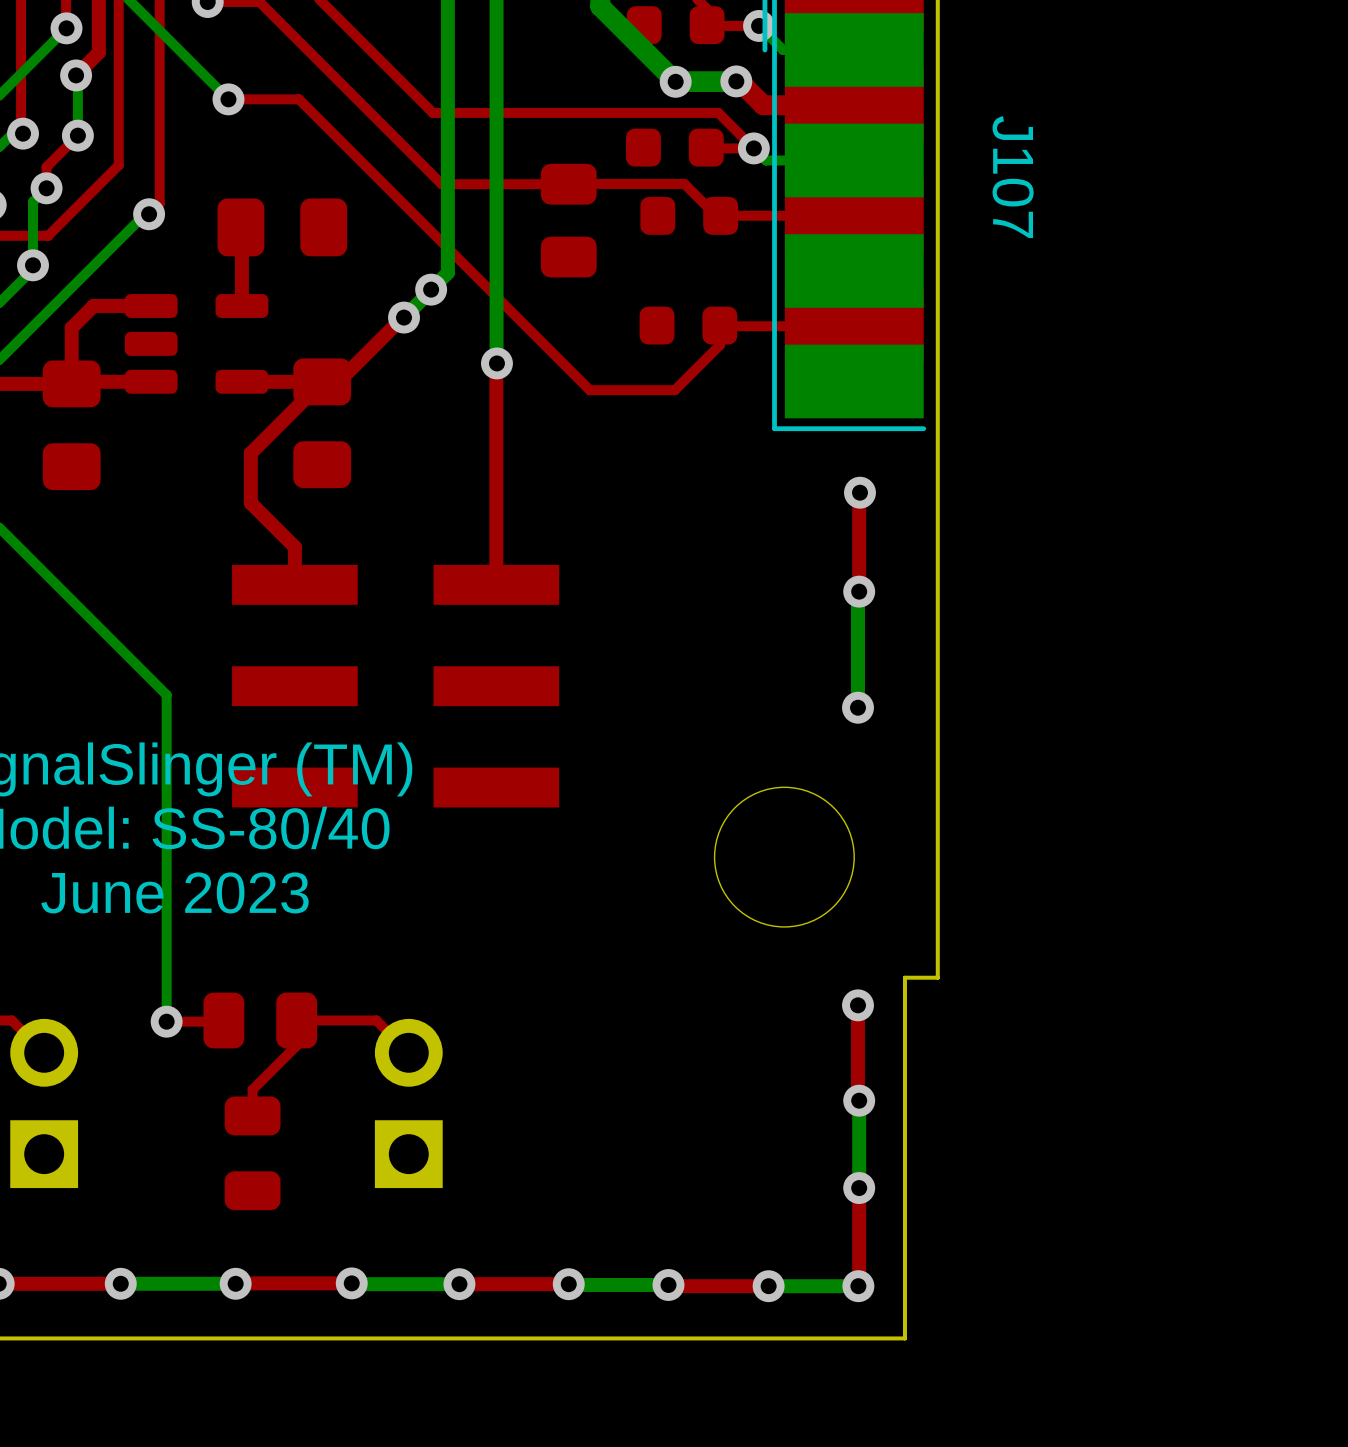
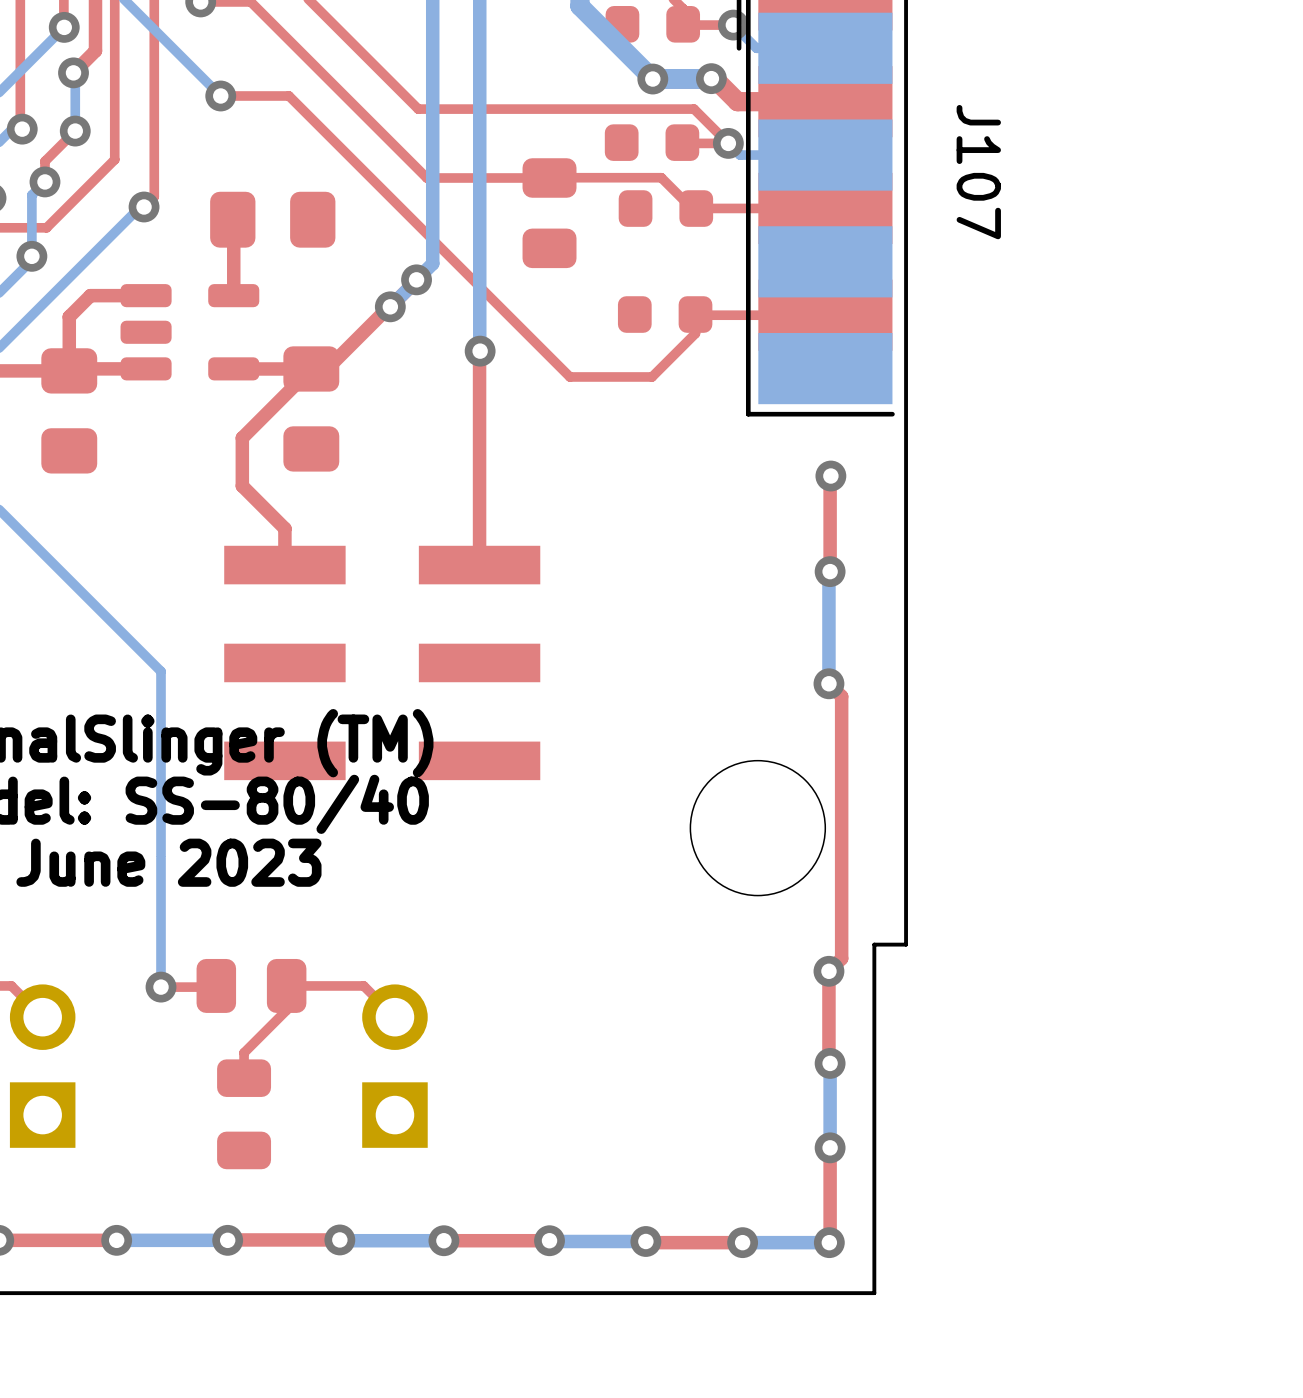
top track: none -> (828, 683) (841, 696) (841, 958) (828, 971)

